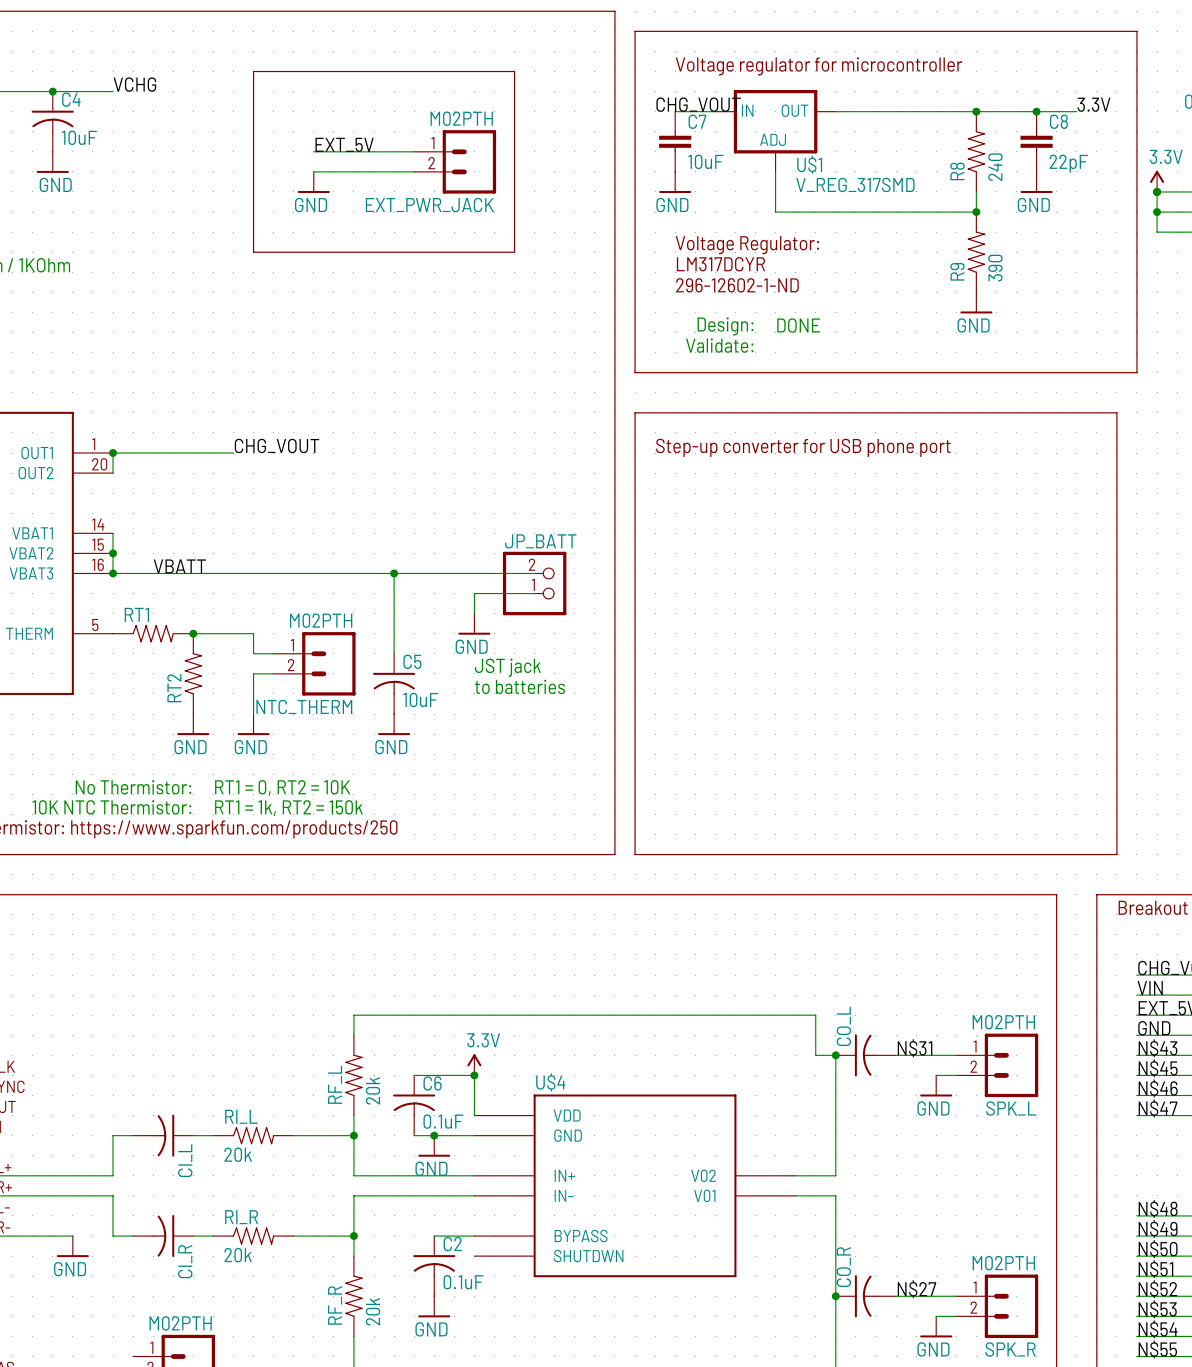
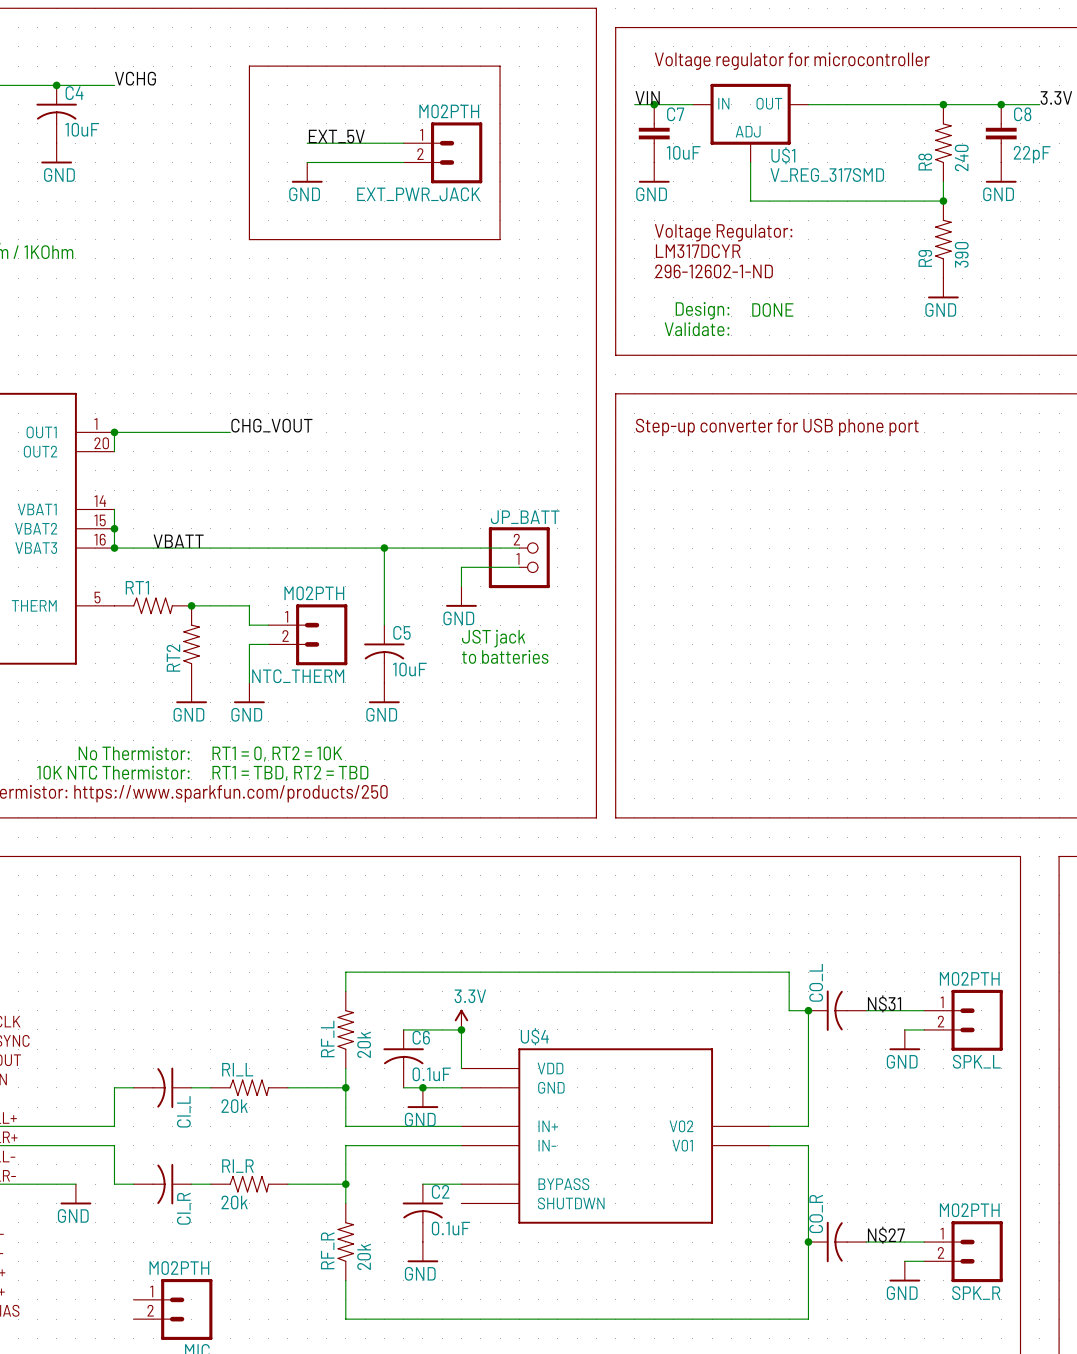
label: CHG_VOUT (698, 104) -> VIN (647, 97)
wire: none -> (634, 104) (654, 104)
junction: none -> (654, 104)
text: RT1 = 1k, RT2 = 150k (288, 808) -> RT1 = TBD, RT2 = TBD (290, 773)

